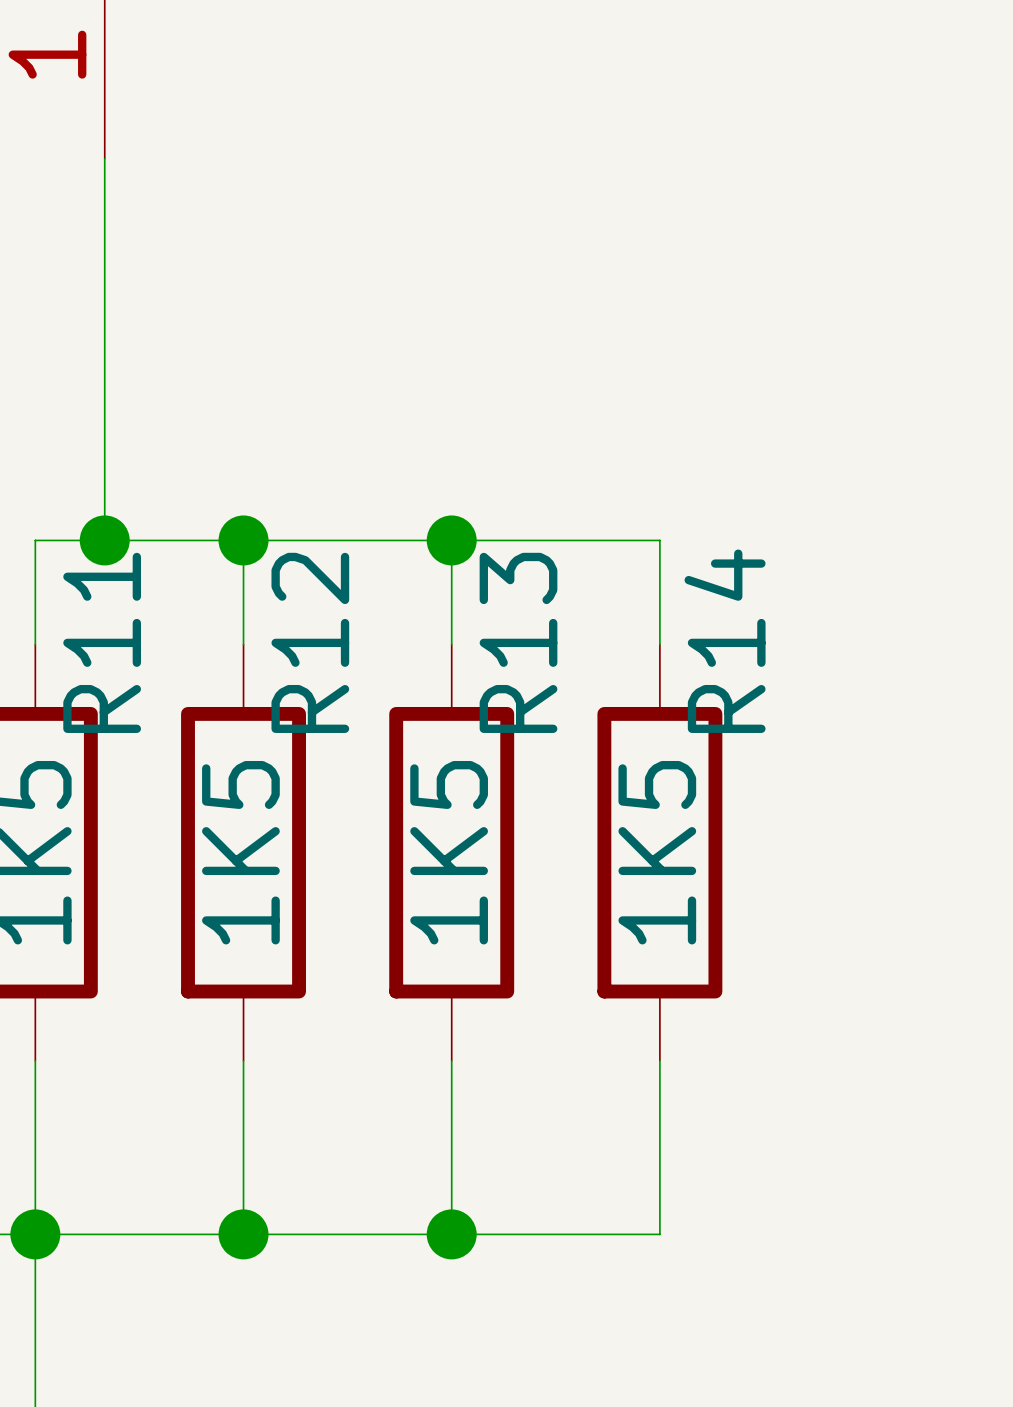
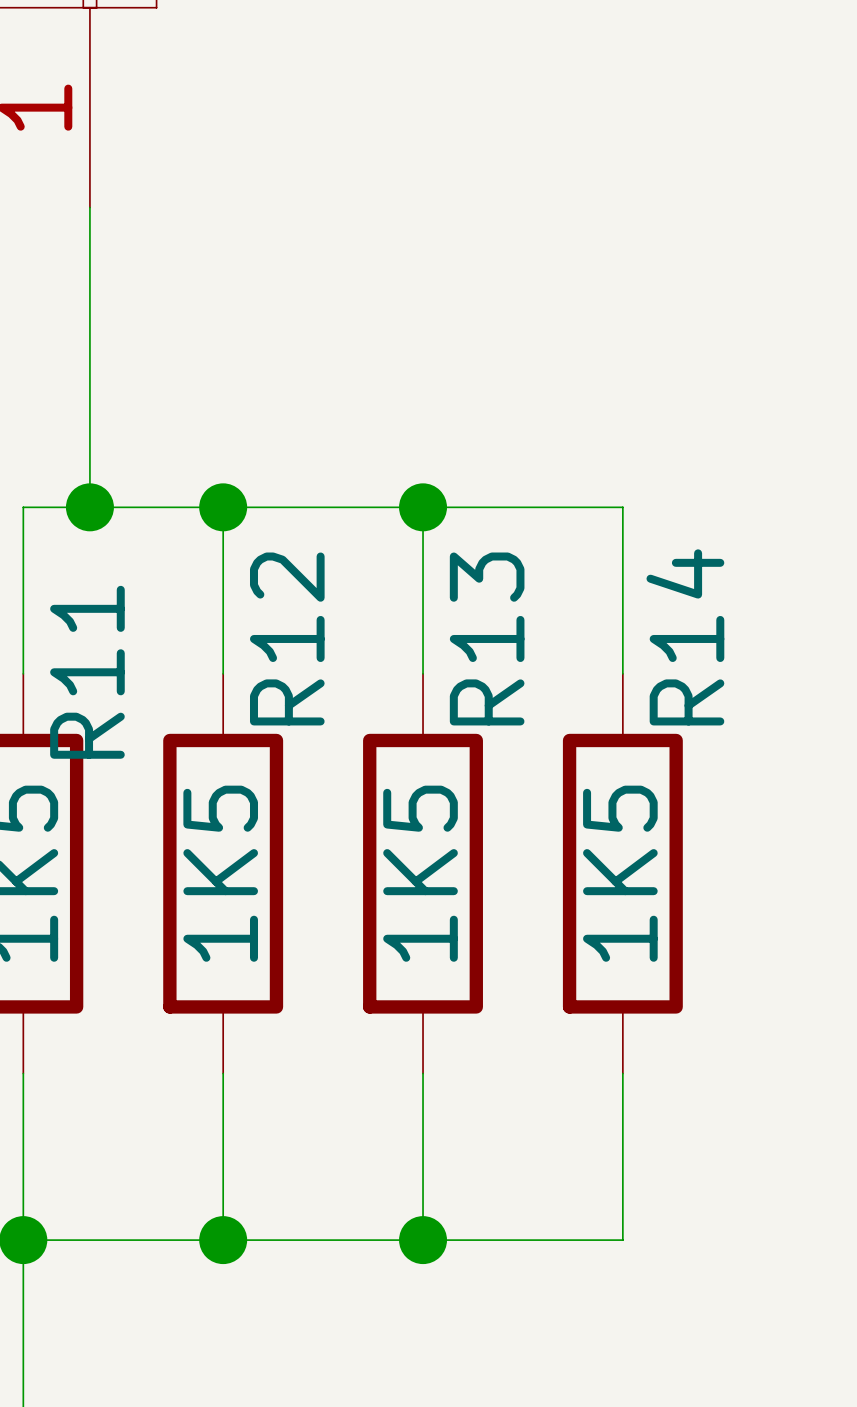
wire: (104, 471) (104, 540) -> (223, 507) (223, 573)
wire: none -> (423, 507) (423, 573)
wire: (35, 540) (659, 540) -> (23, 573) (23, 507) (622, 507) (622, 573)
junction position: (104, 540) -> (89, 507)
junction position: (243, 540) -> (223, 507)
junction position: (451, 540) -> (423, 507)
R14 name position: R14 (725, 641) -> R14 (685, 637)
R12 name position: R12 (310, 642) -> R12 (287, 638)
R13 name position: R13 (518, 642) -> R13 (487, 638)

